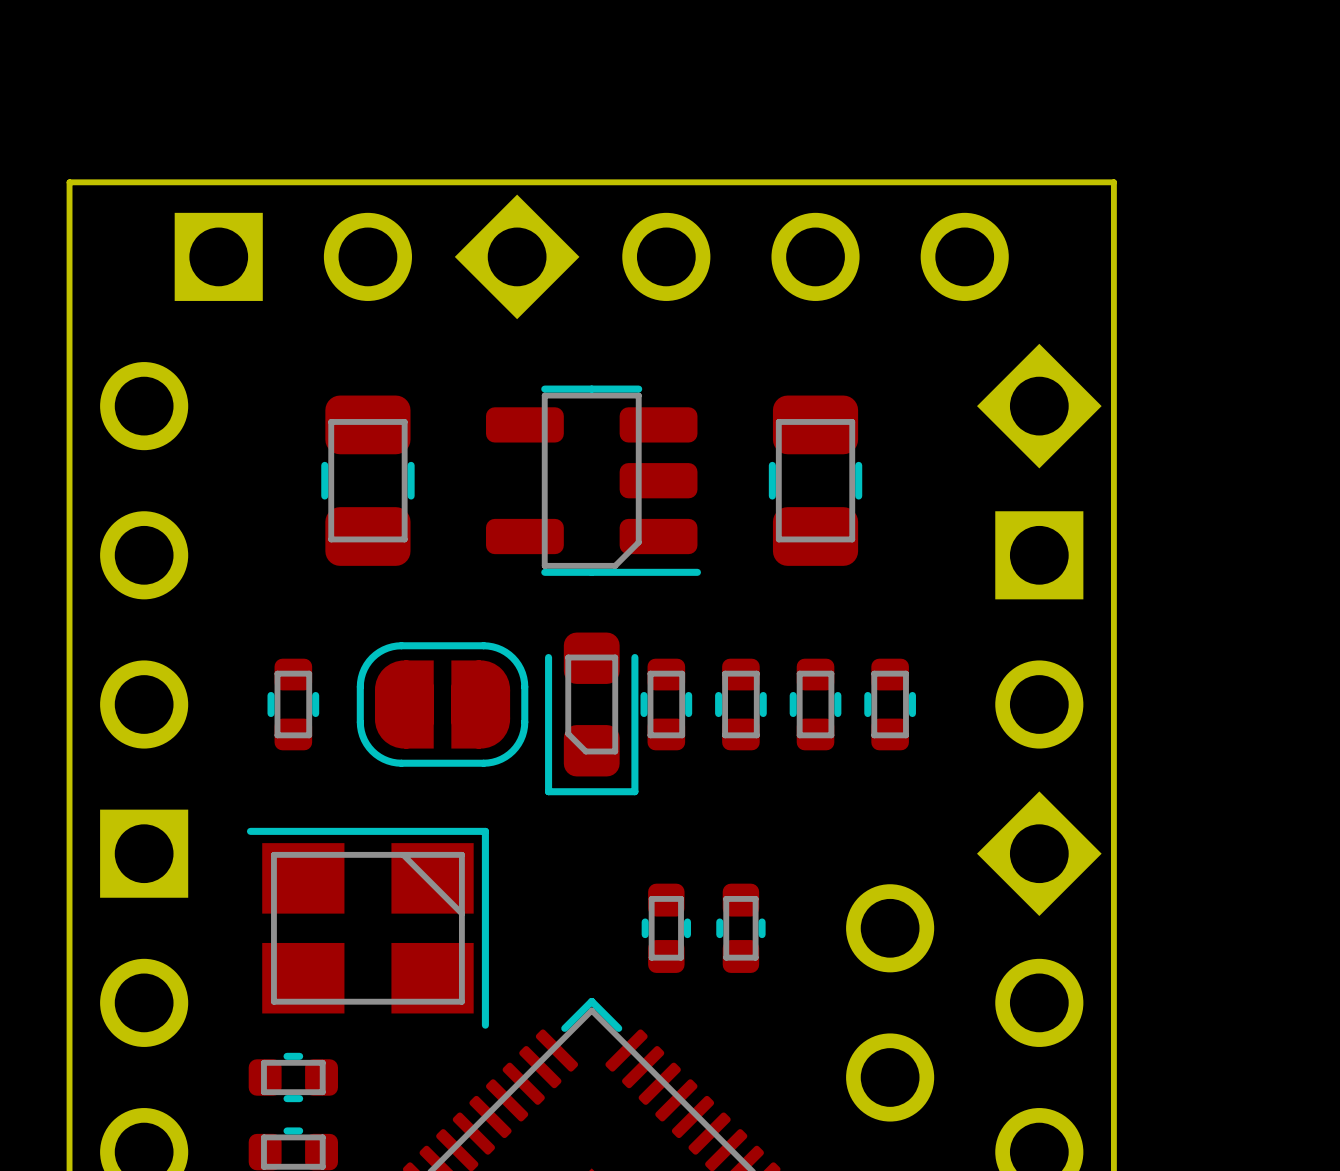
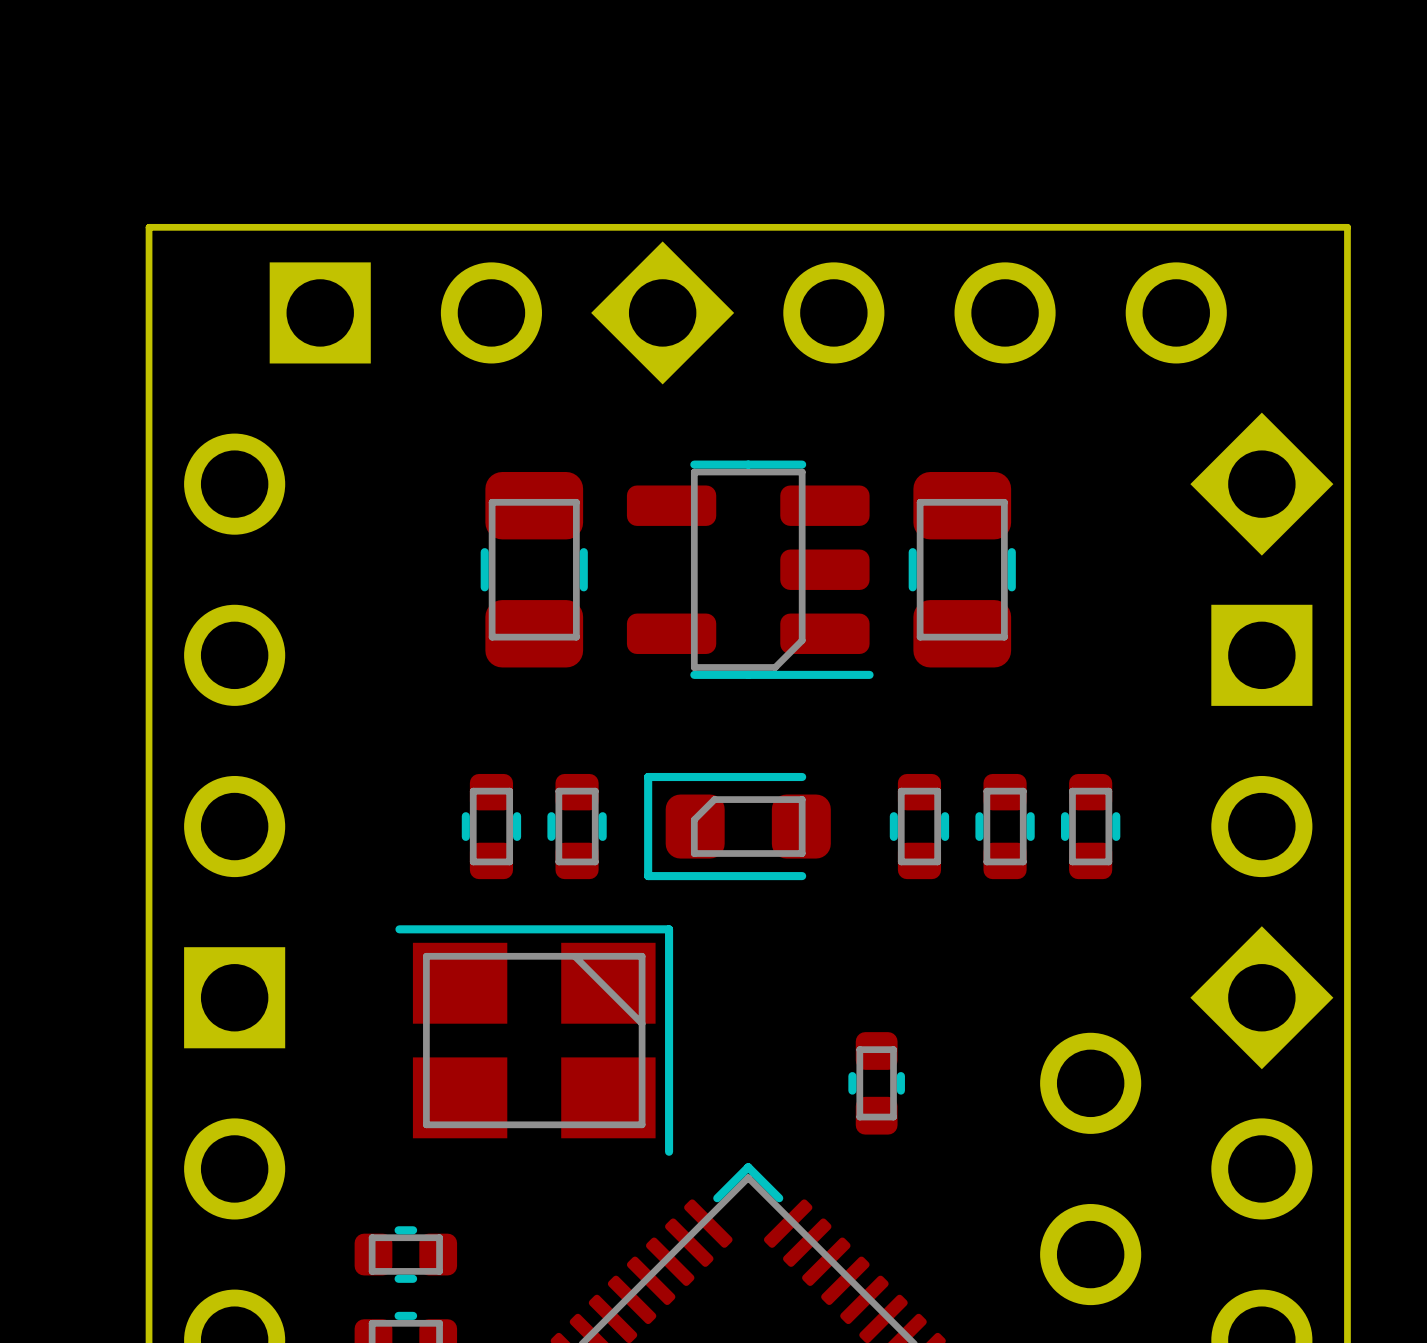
part position: (367, 480) -> (534, 569)
part position: (815, 480) -> (962, 569)
part footprint: [356, 642, 529, 767] -> [547, 773, 607, 880]
part position: (293, 704) -> (491, 826)
part: (666, 704) -> none
part rotation: 0° (591, 713) -> 90° clockwise (737, 826)
part position: (367, 928) -> (534, 1040)
part: (666, 928) -> none
part: none -> (876, 1083)
part: (740, 928) -> none

